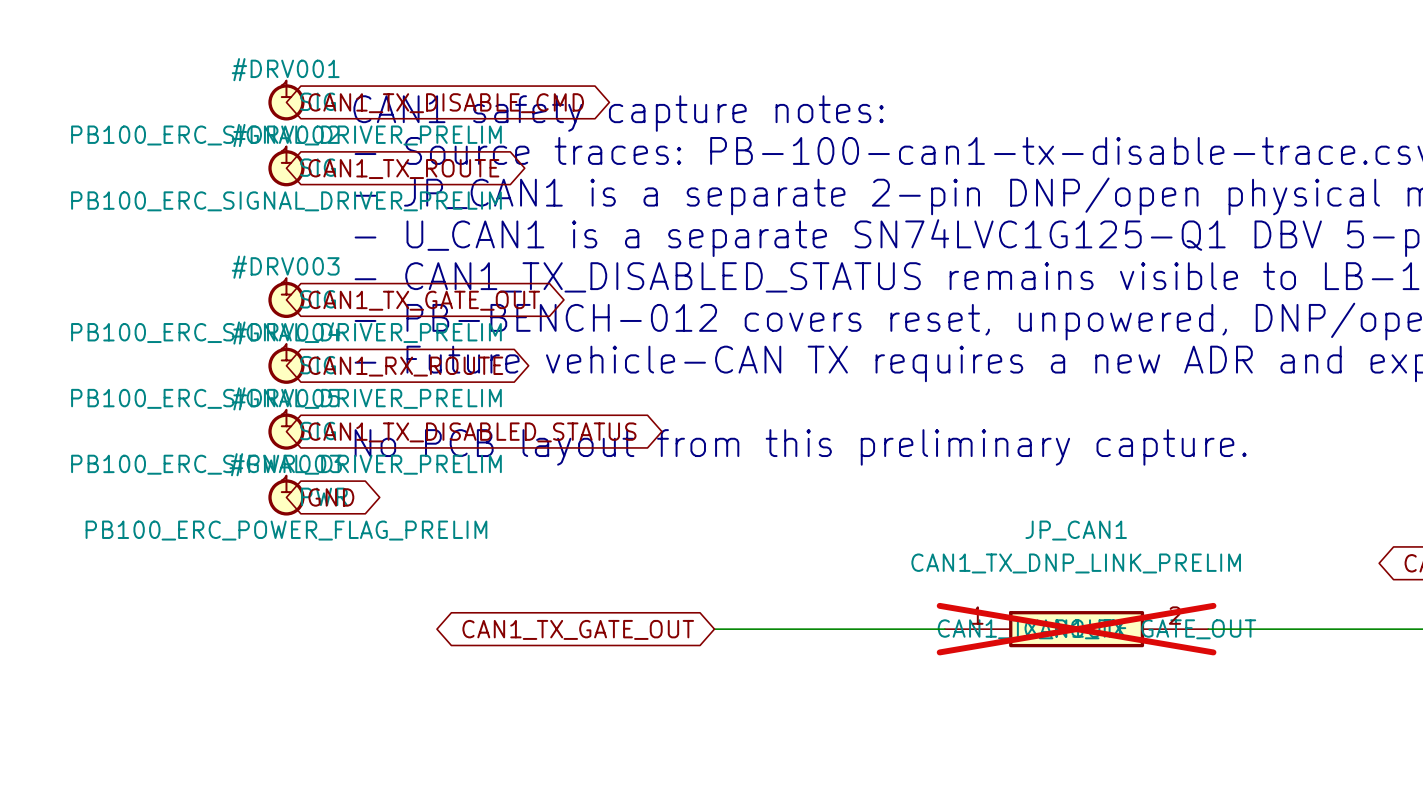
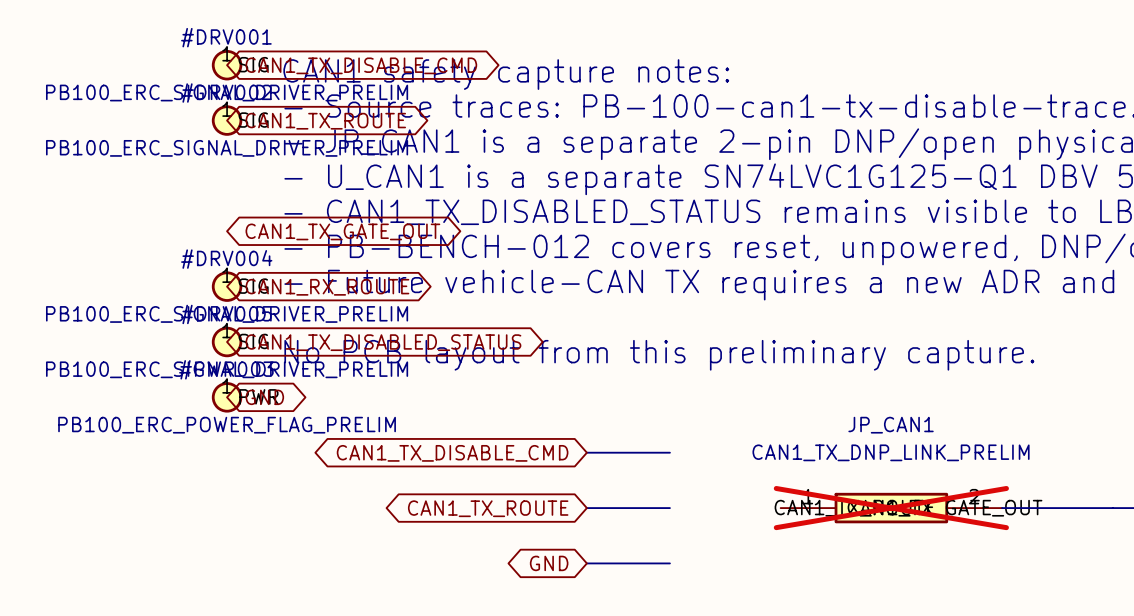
#DRV003: PB100_ERC_SIGNAL_DRIVER_PRELIM (286, 299) -> none
wire: none -> (586, 452) (669, 452)
global label: none -> CAN1_TX_DISABLE_CMD (452, 453)
global label: CAN1_TX_GATE_OUT (578, 629) -> CAN1_TX_ROUTE (488, 508)
wire: (813, 629) (944, 629) -> none
global label: none -> GND (549, 563)
wire: none -> (586, 563) (669, 563)

